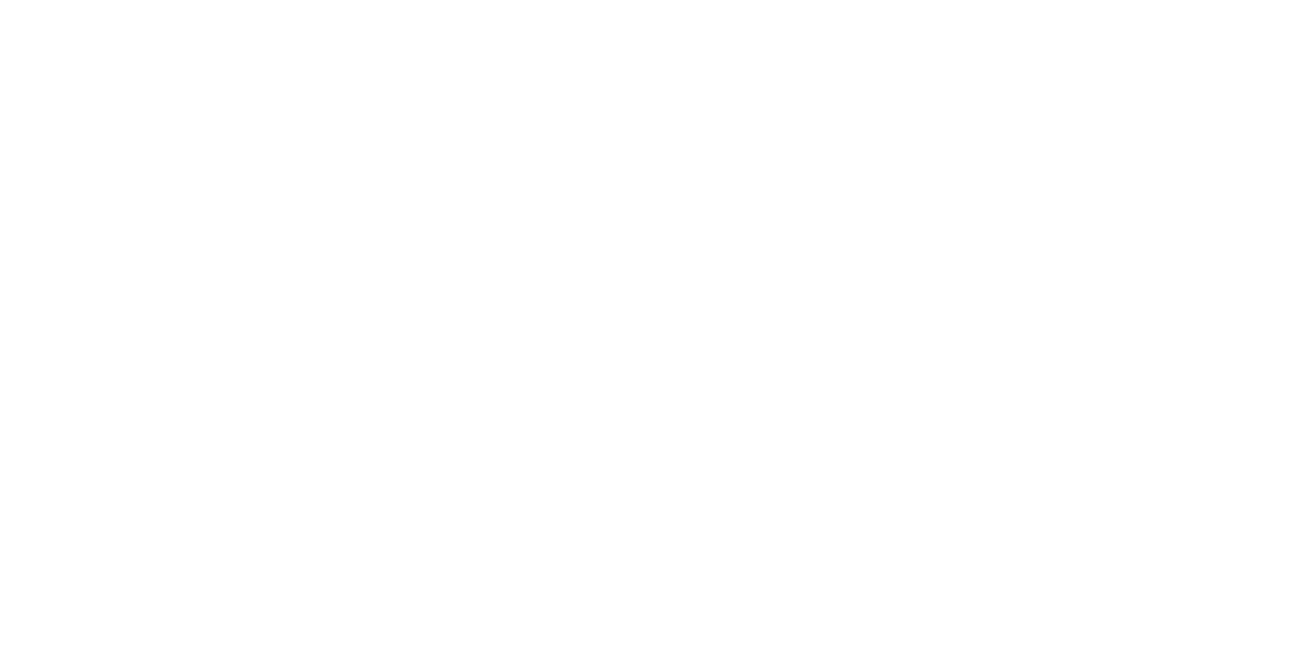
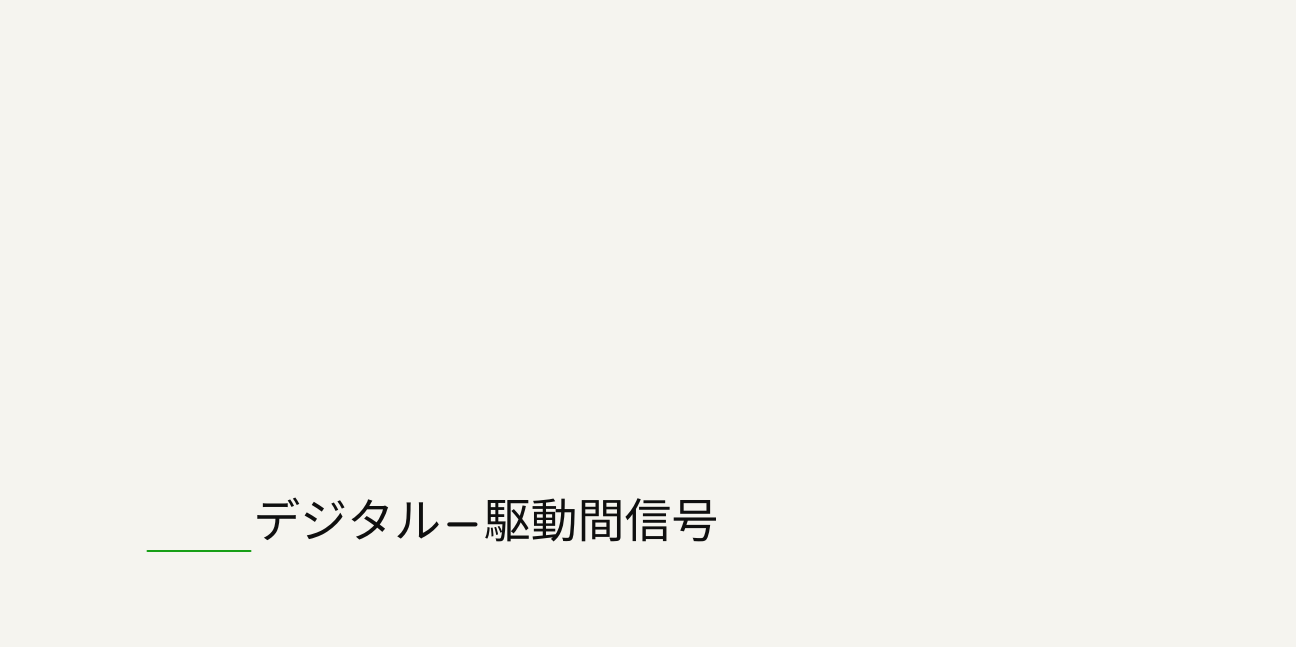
label: none -> デジタル-駆動間信号 (486, 519)
wire: none -> (147, 550) (250, 550)

